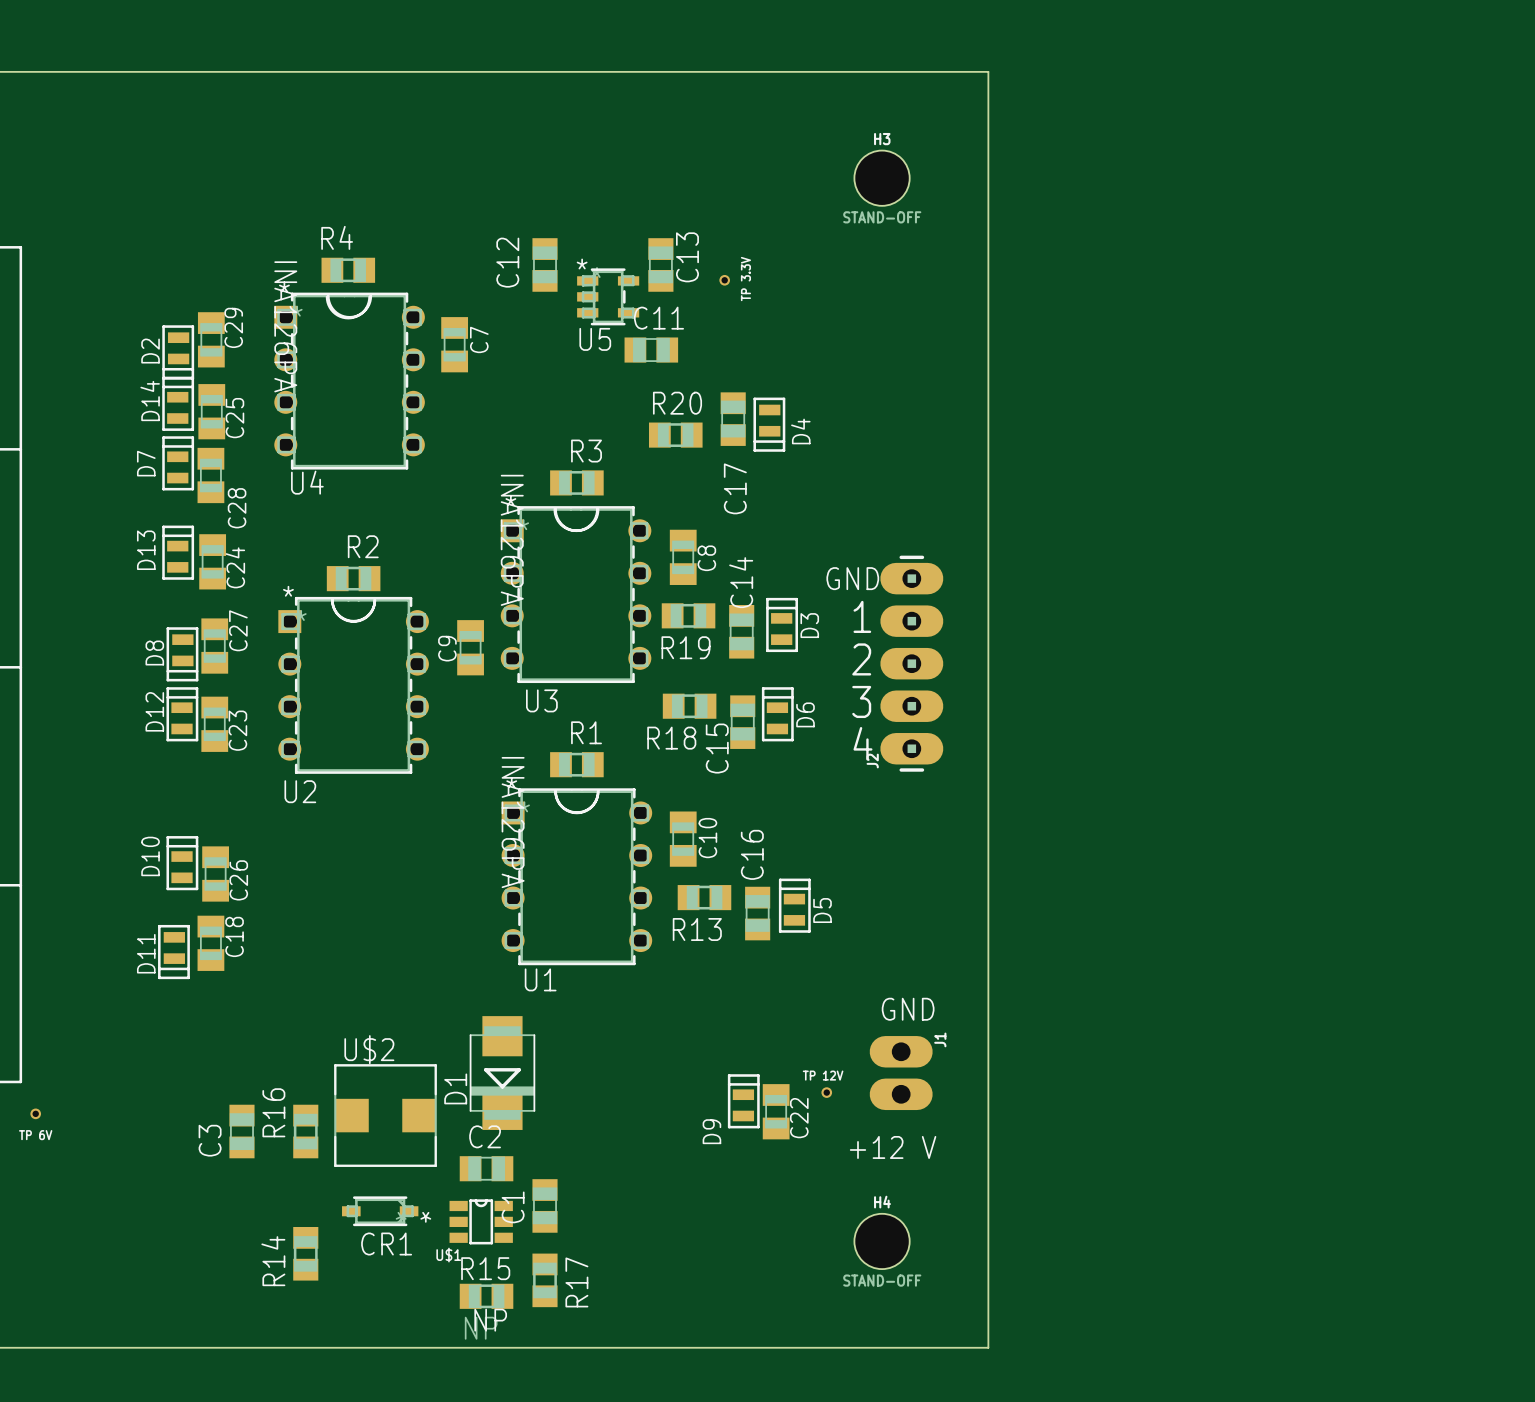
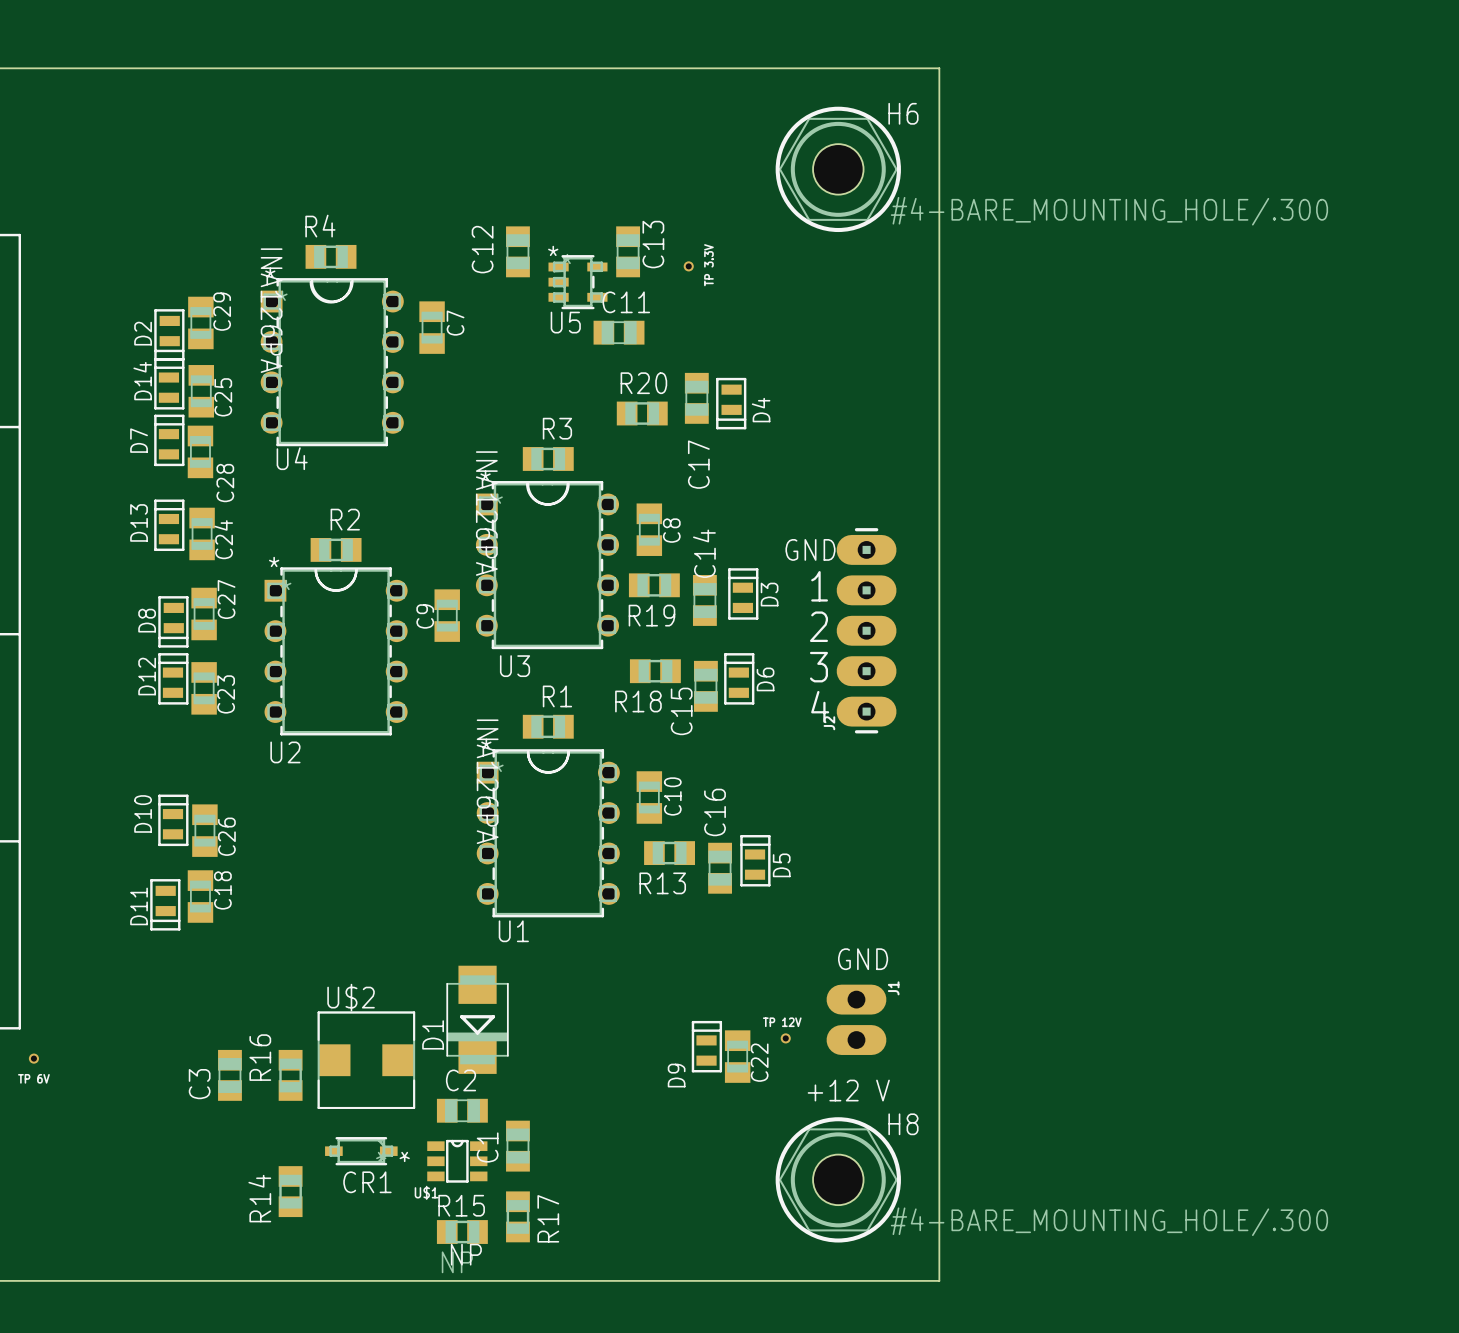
H3: STAND-OFF (882, 178) -> none
H6: none -> #4-BARE_MOUNTING_HOLE/.300 (838, 169)
H4: STAND-OFF (882, 1241) -> none
H8: none -> #4-BARE_MOUNTING_HOLE/.300 (838, 1179)

